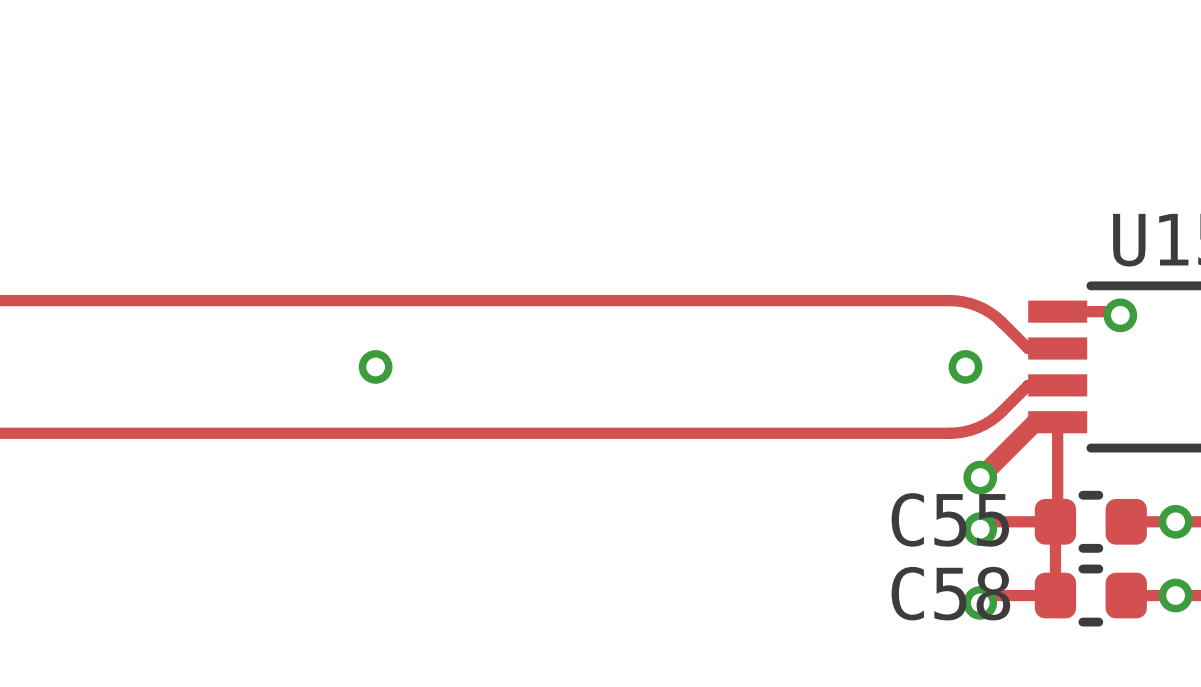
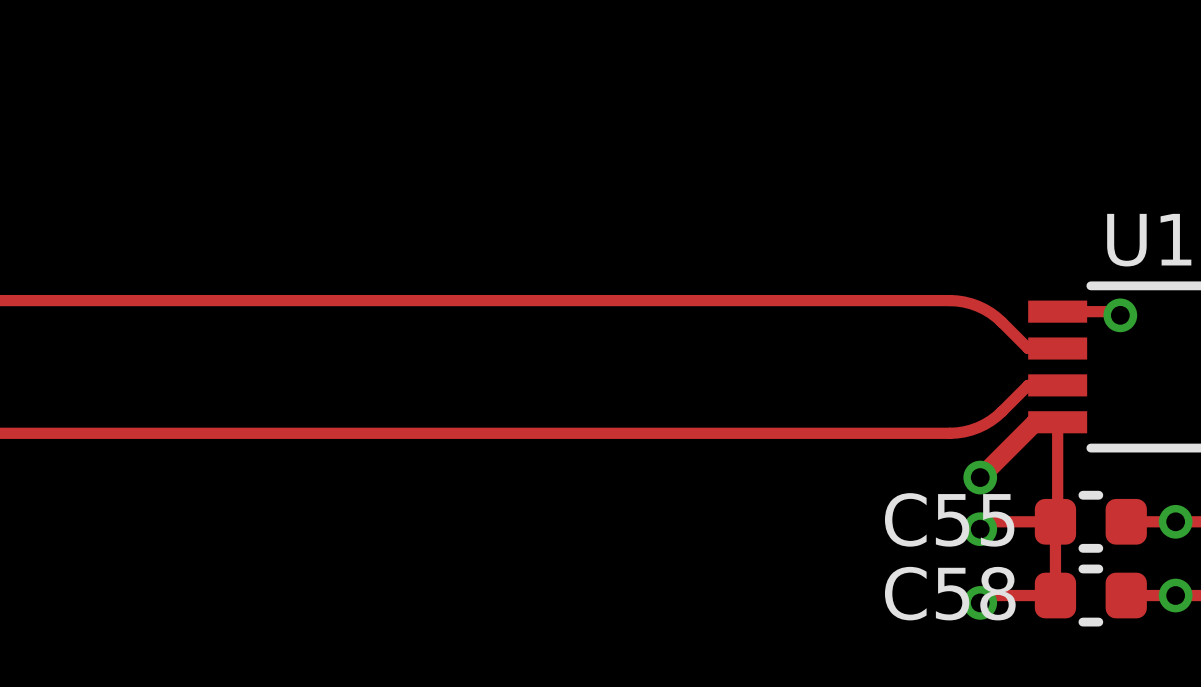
via: (375, 366) -> none
via: (965, 366) -> none

